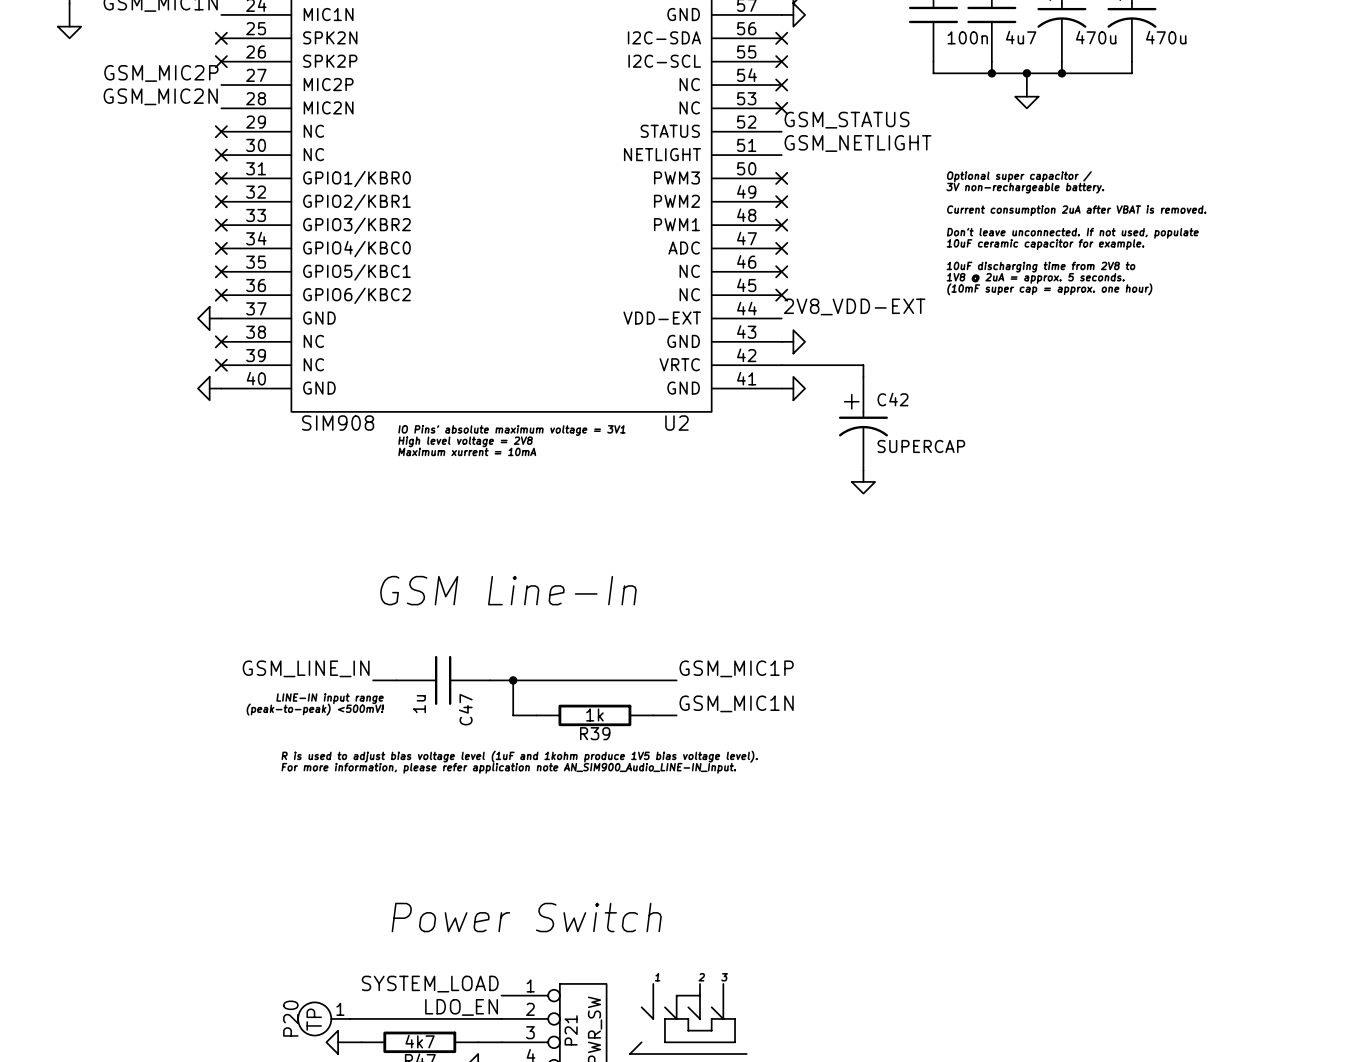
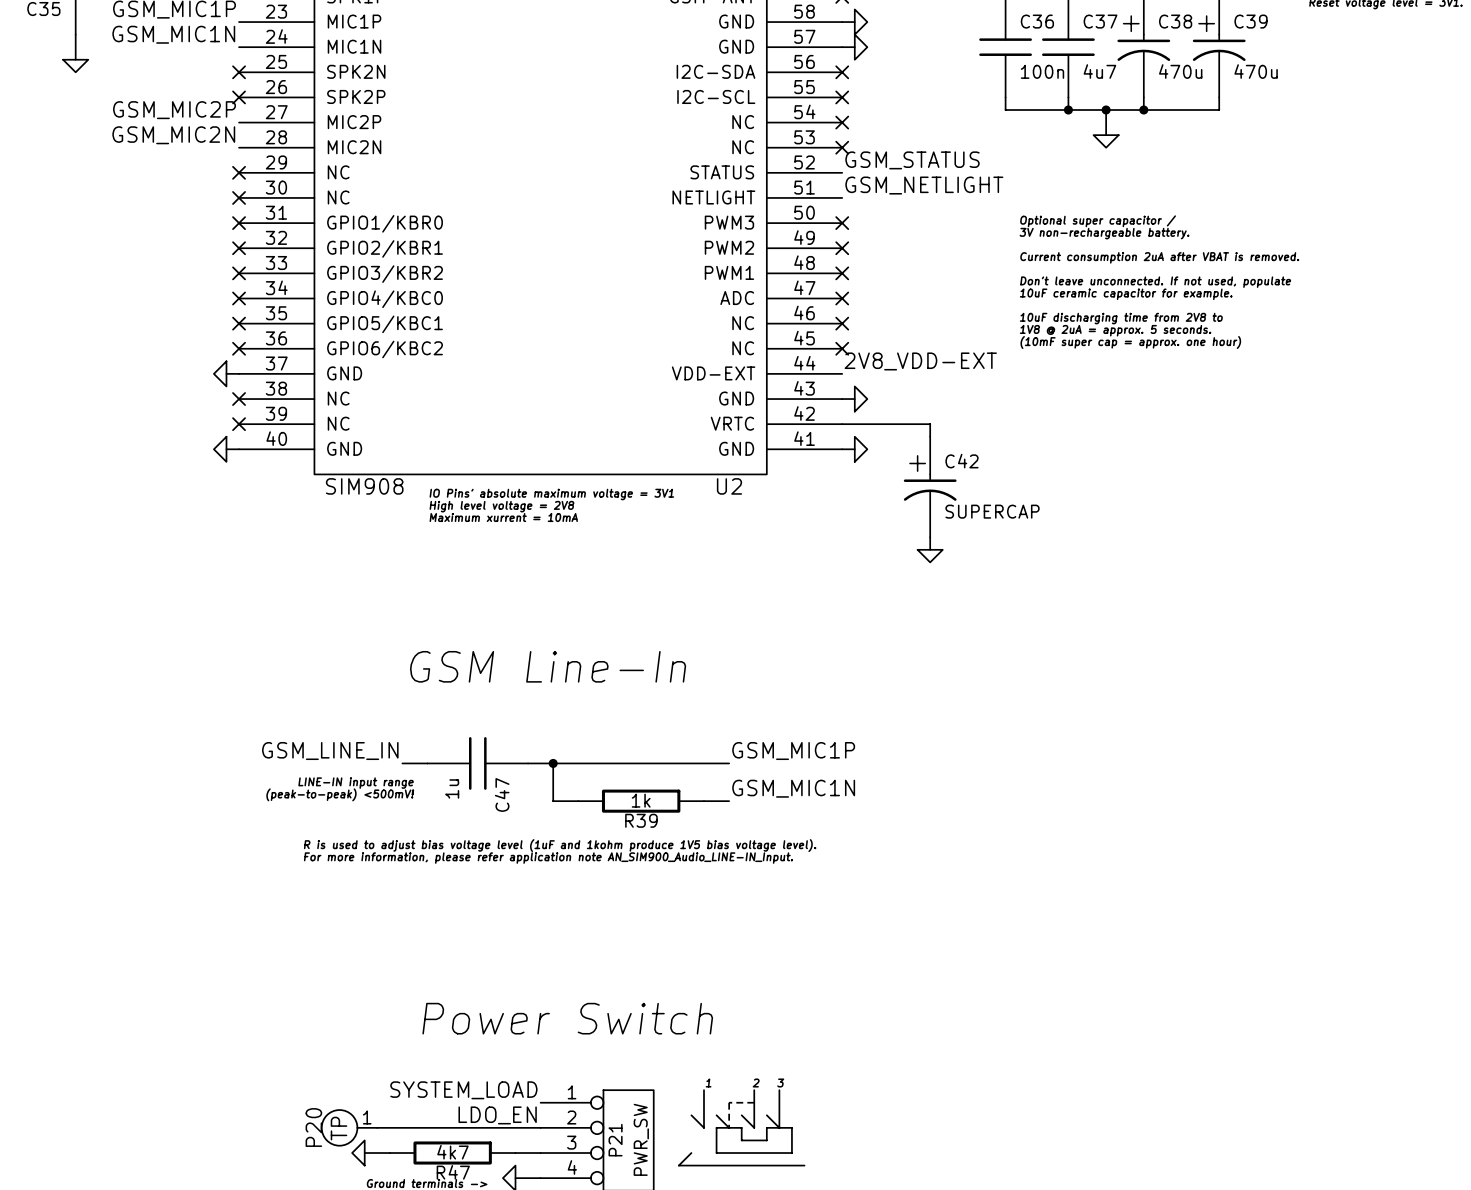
bus: (699, 995) (676, 995) (676, 1018) -> none
line: none -> (754, 1102) (729, 1102) (729, 1127)

